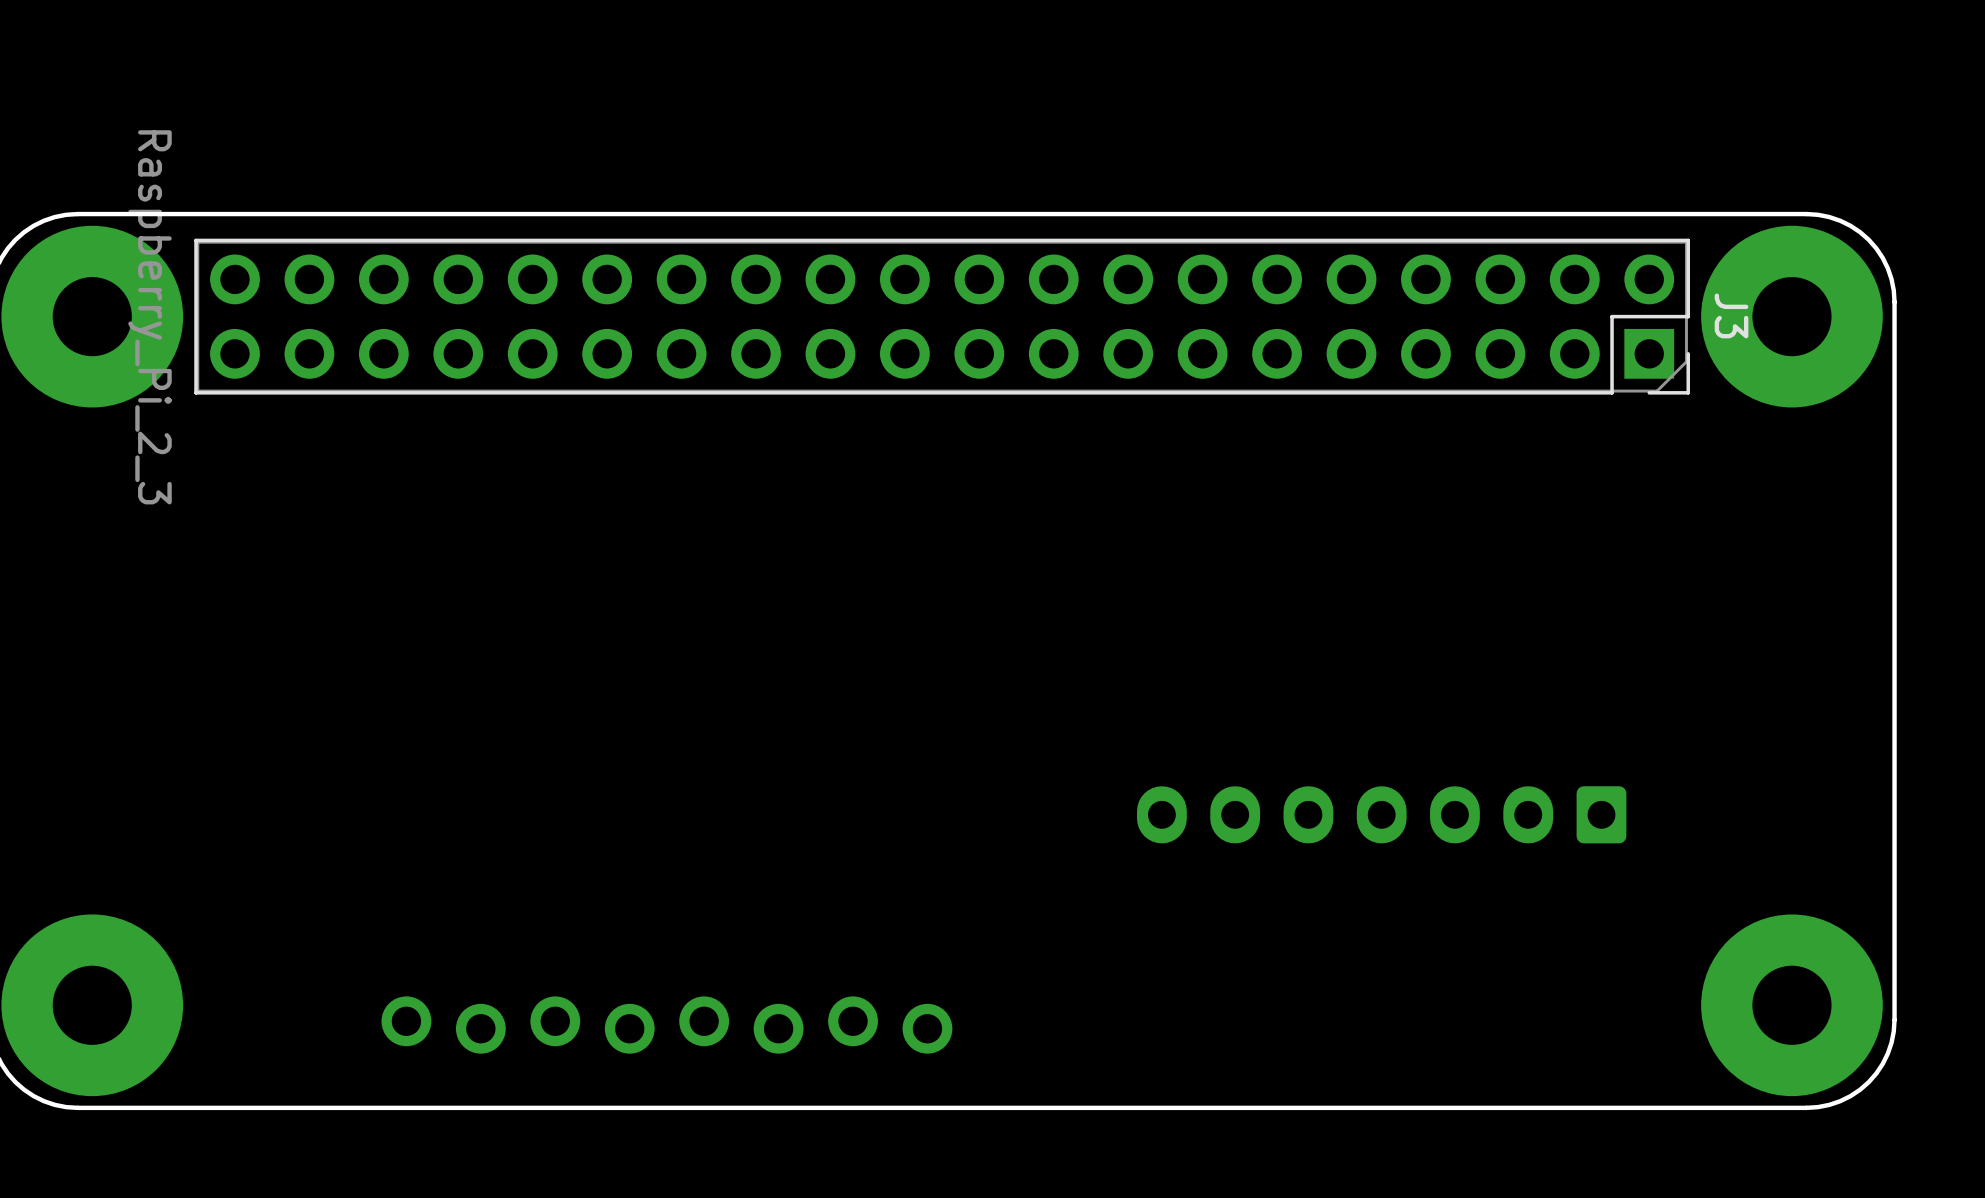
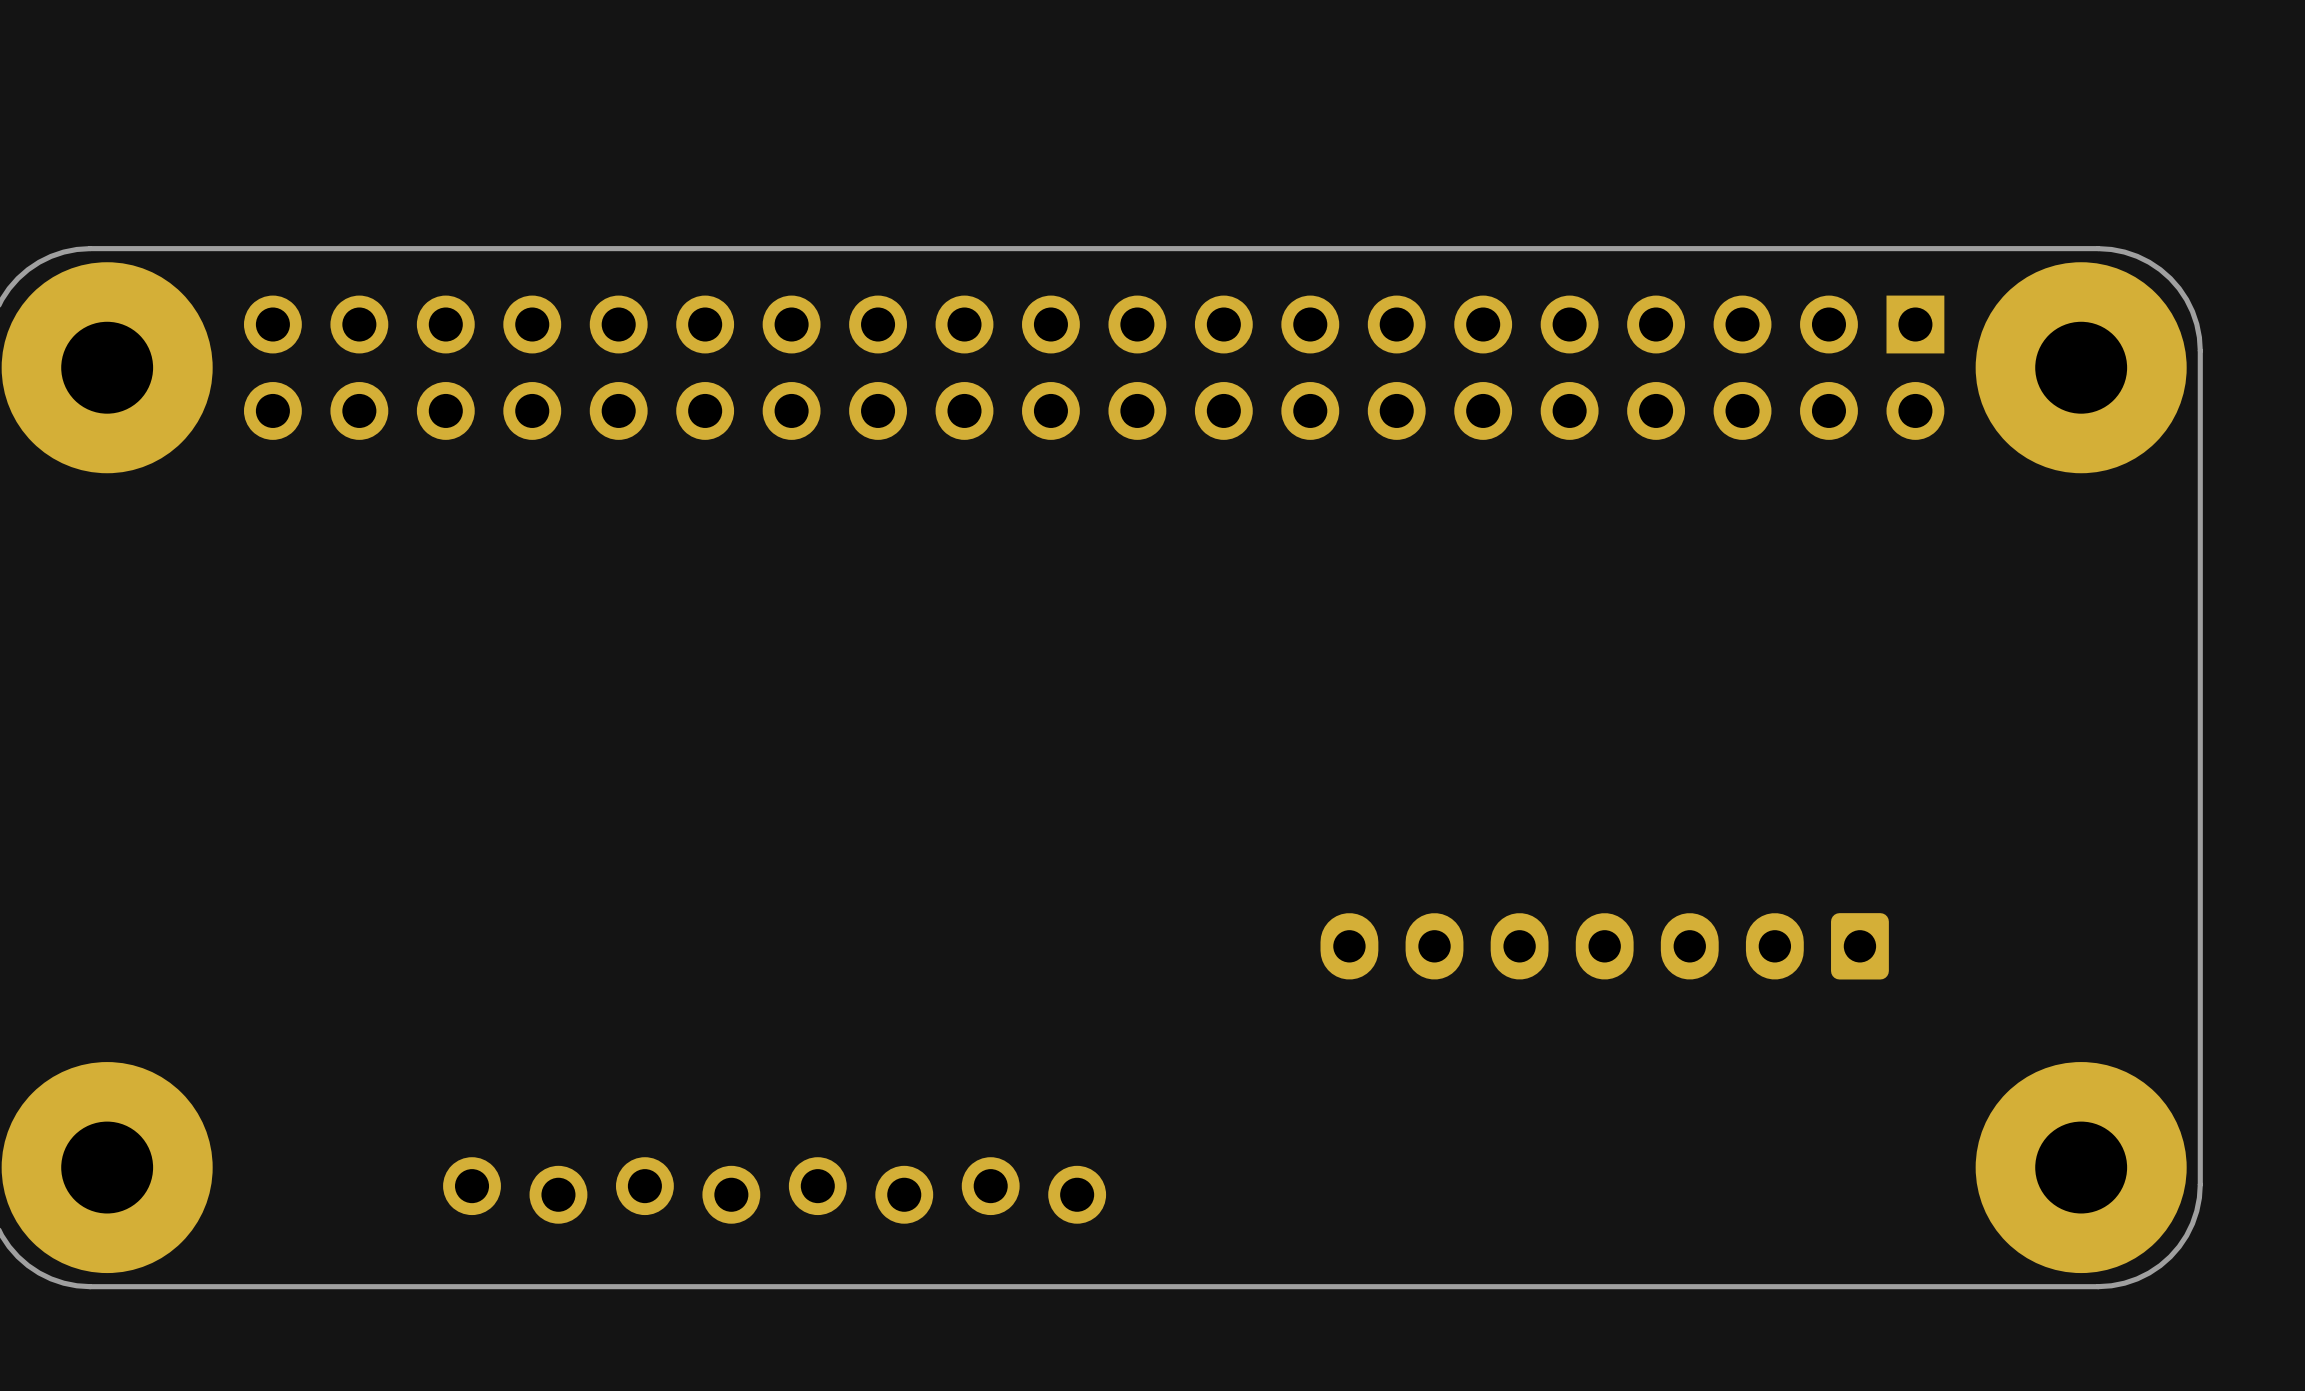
J3 side: bottom (942, 316) -> top (1094, 367)

